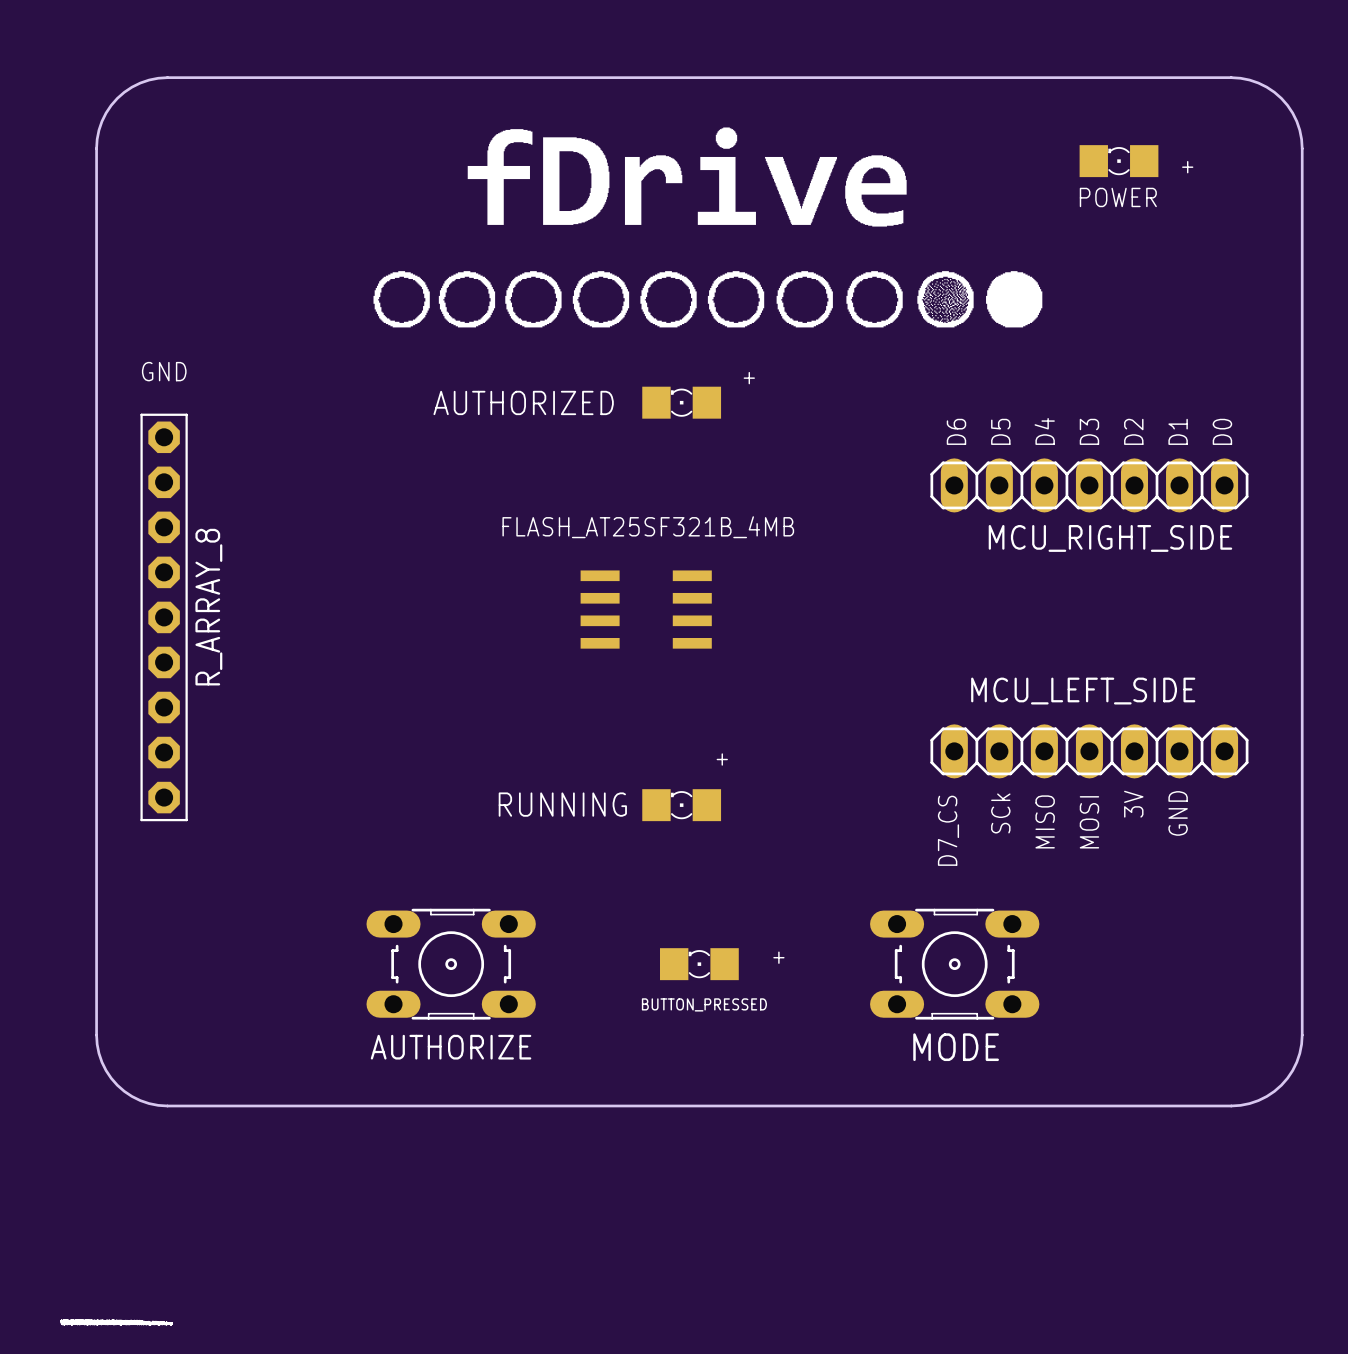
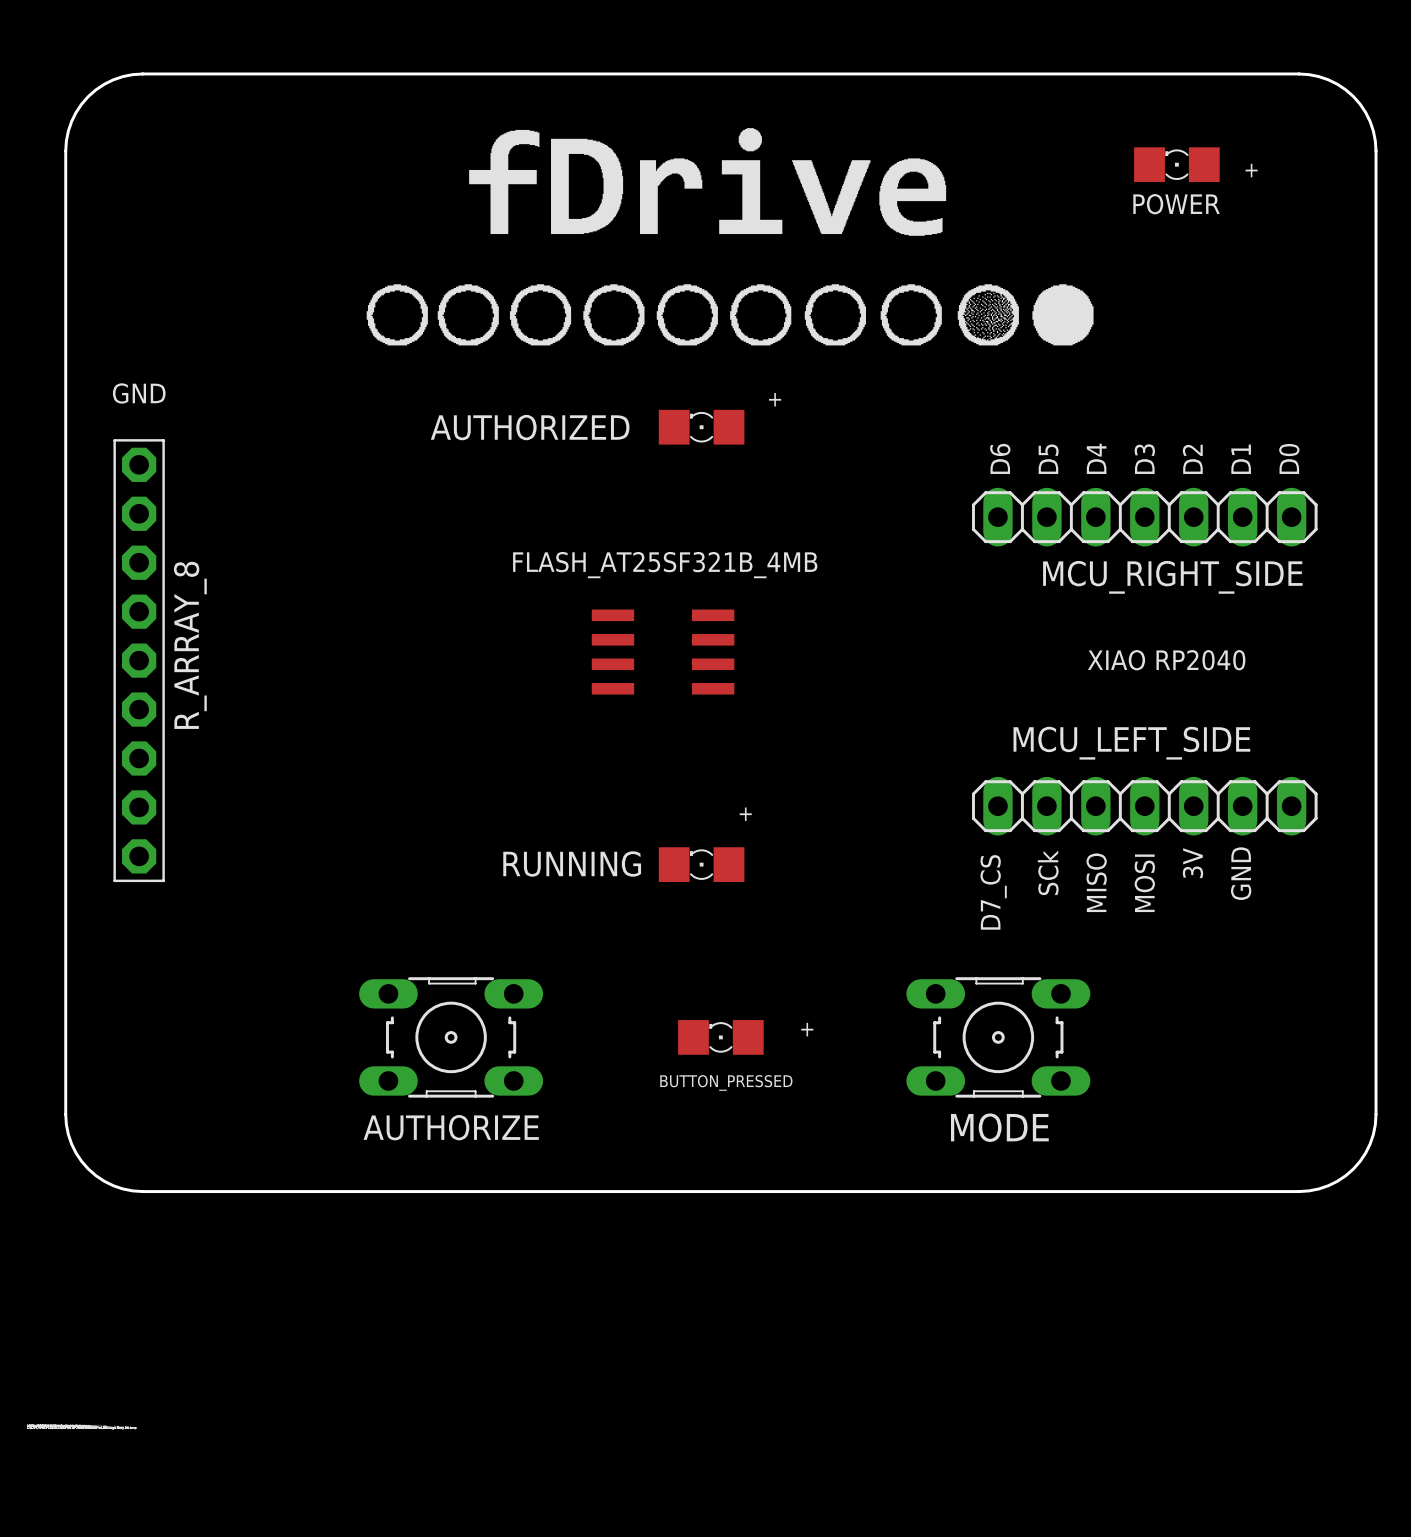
text: none -> XIAO RP2040 (1166, 660)

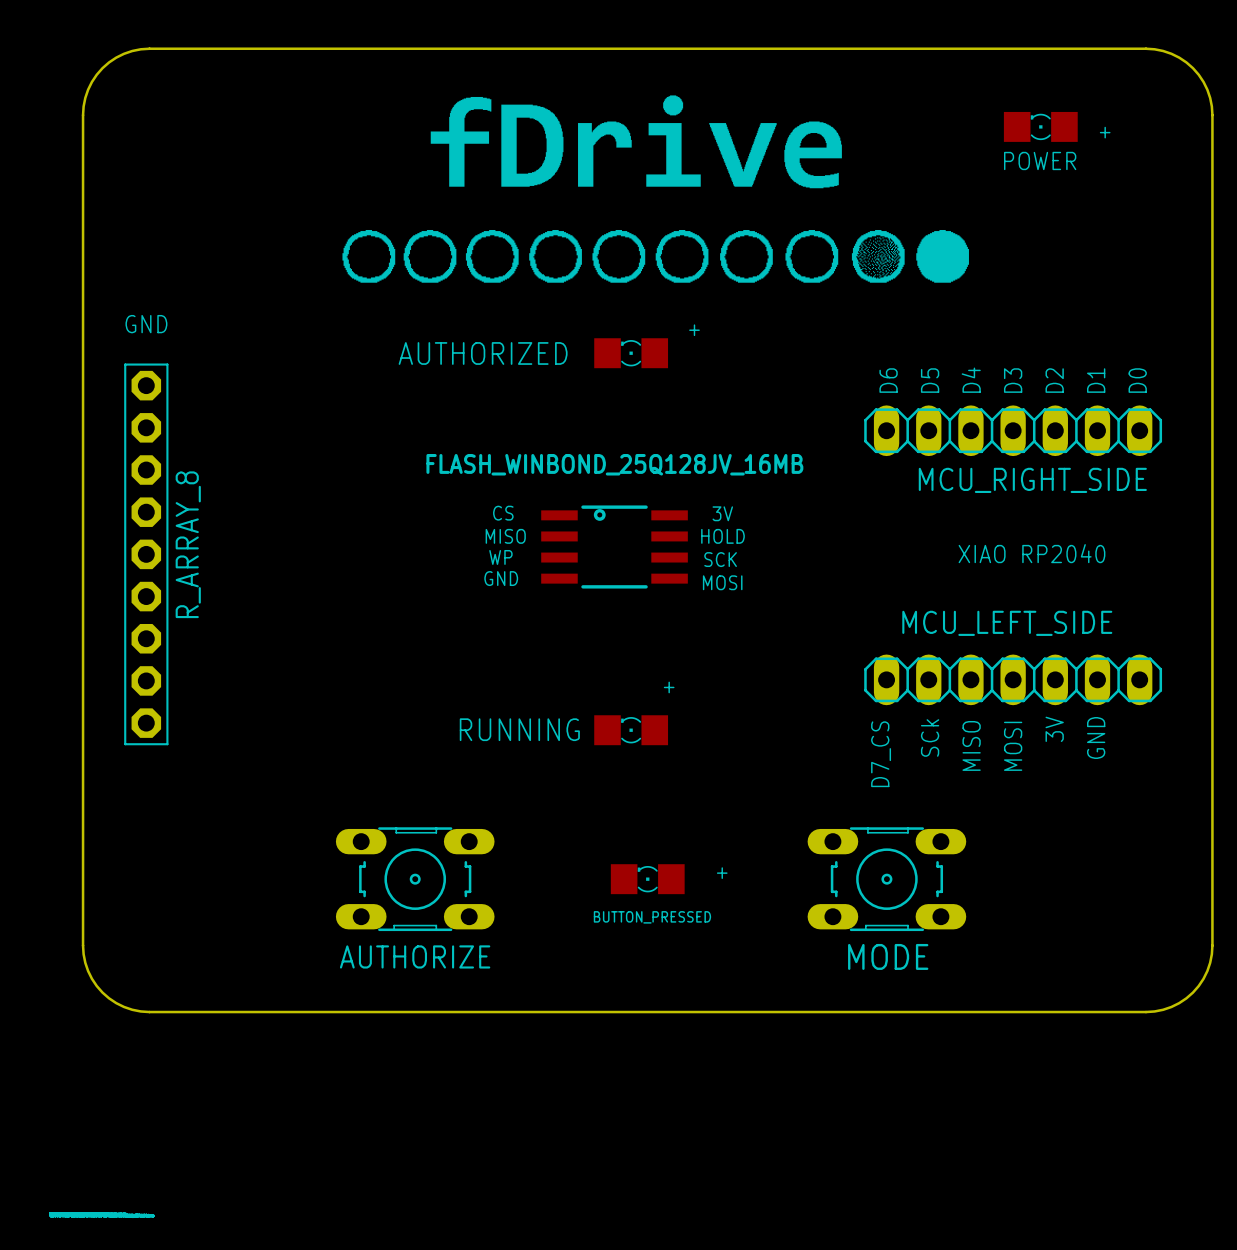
text: none -> CS (503, 513)
text: none -> 3V (722, 513)
text: none -> MISO (505, 536)
text: none -> HOLD (722, 536)
FLASH_AT25SF321B_4MB: (663, 652) -> none
FLASH_WINBOND_25Q128JV_16MB: none -> (614, 546)
text: none -> WP (500, 557)
text: none -> SCK (720, 559)
text: none -> GND (501, 578)
text: none -> MOSI (722, 582)

